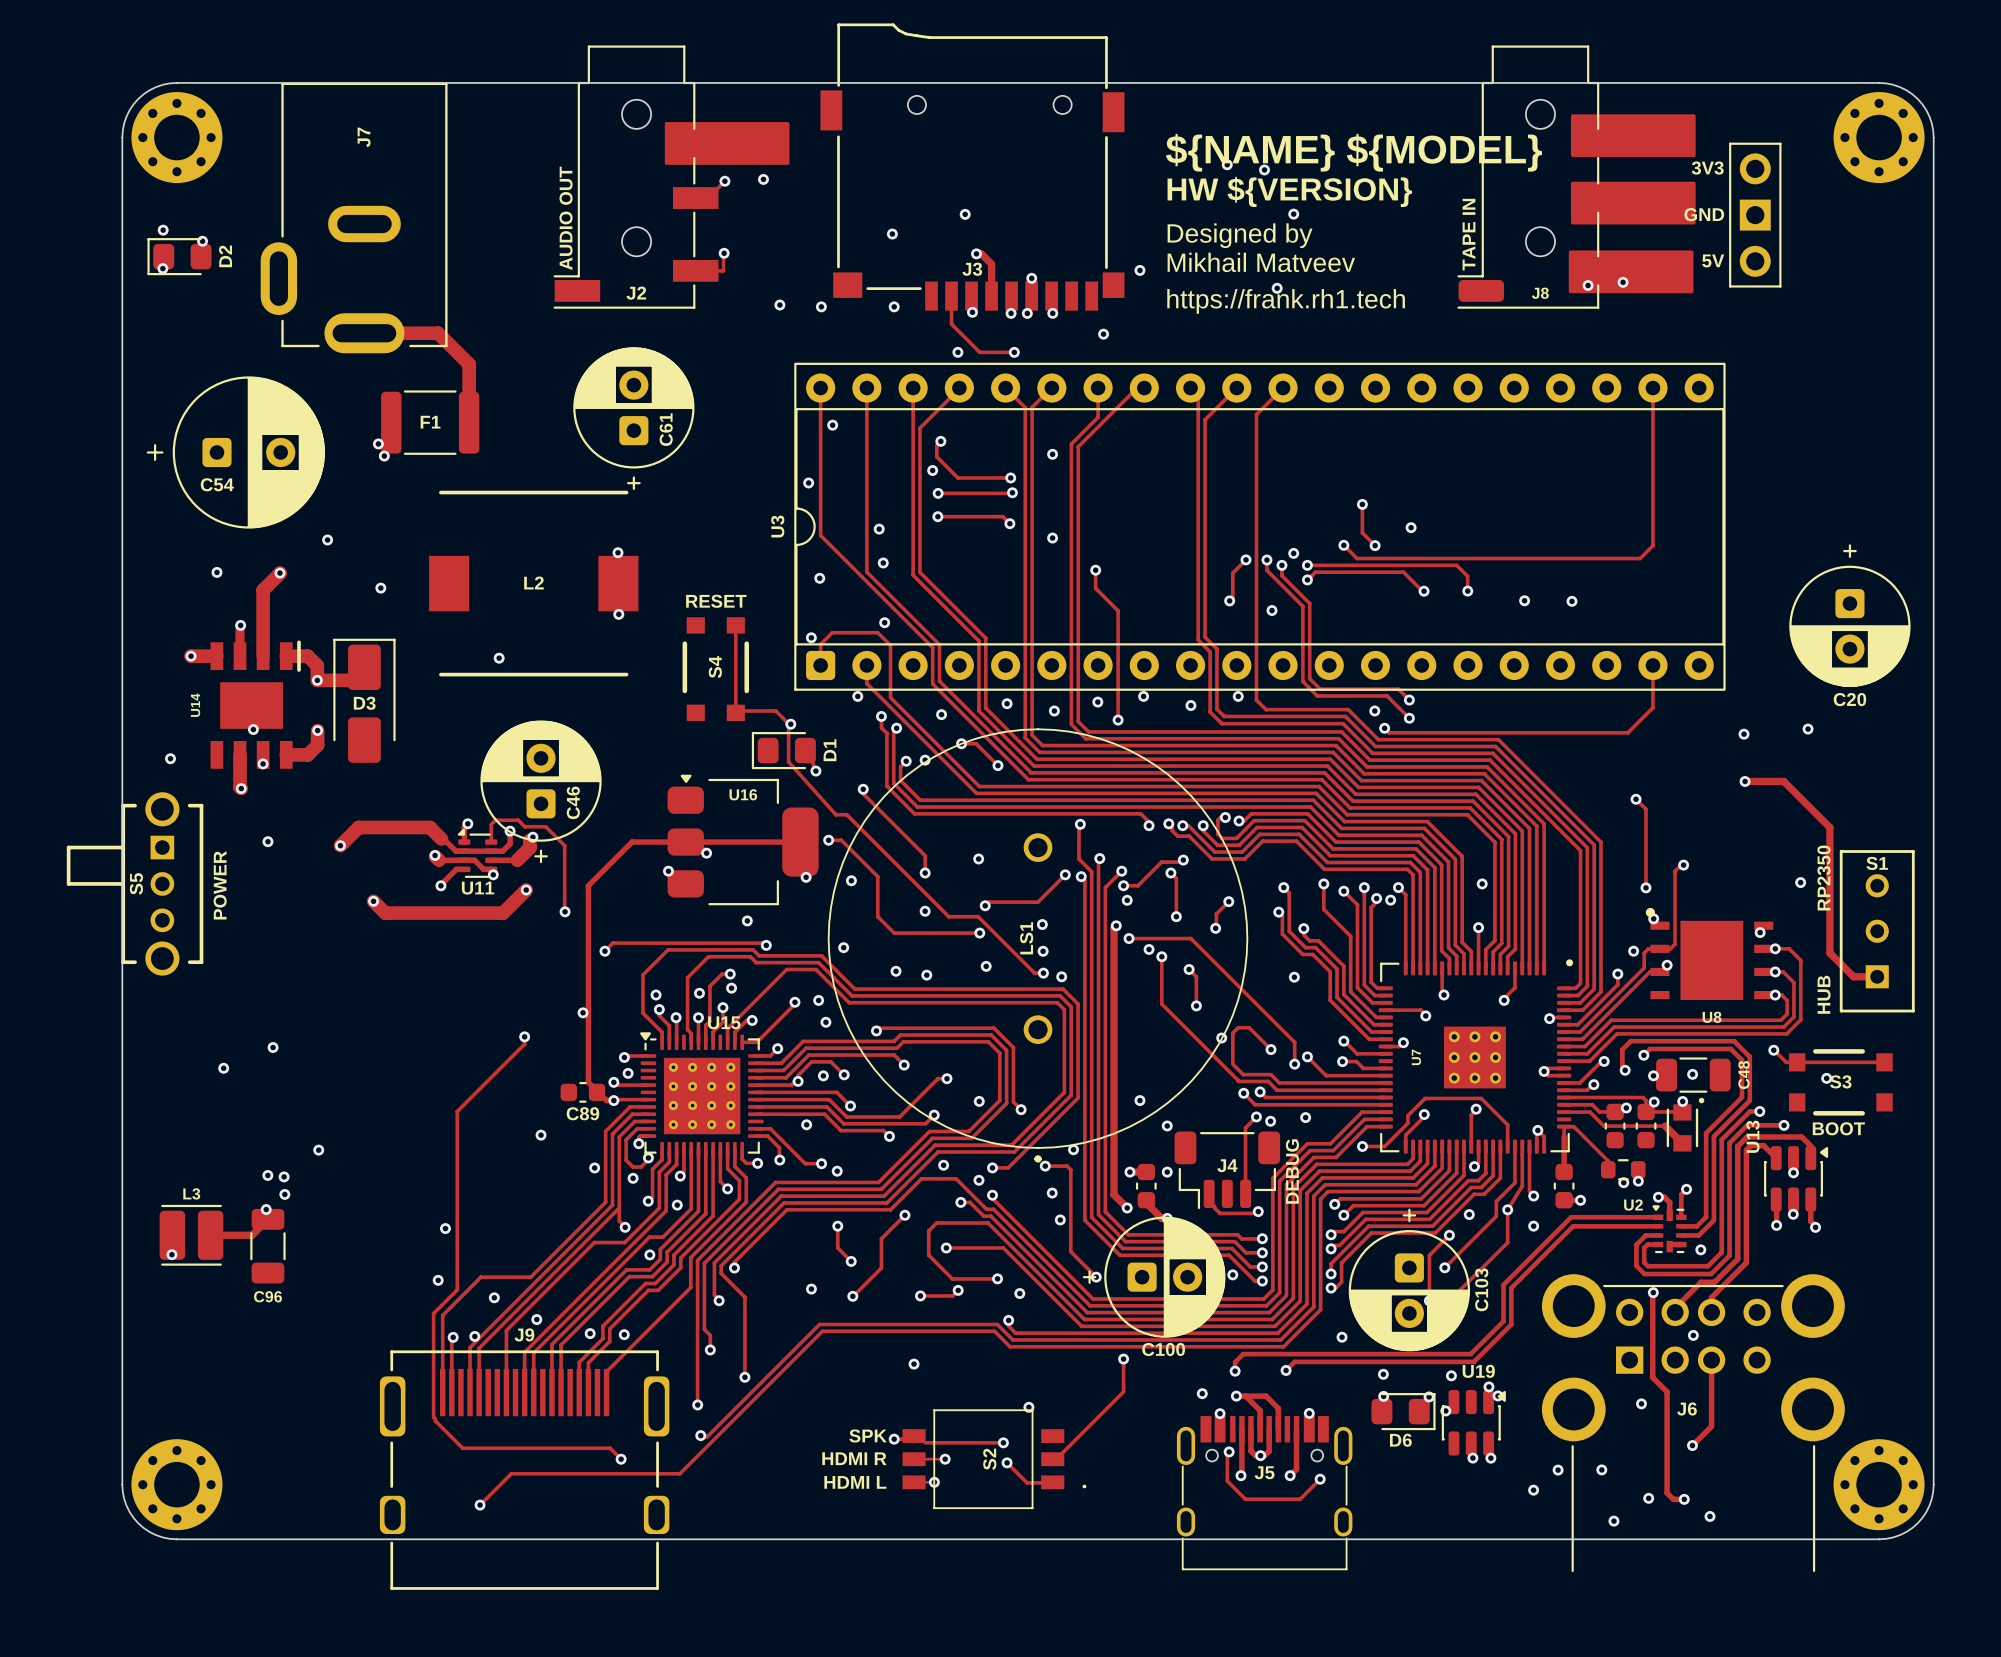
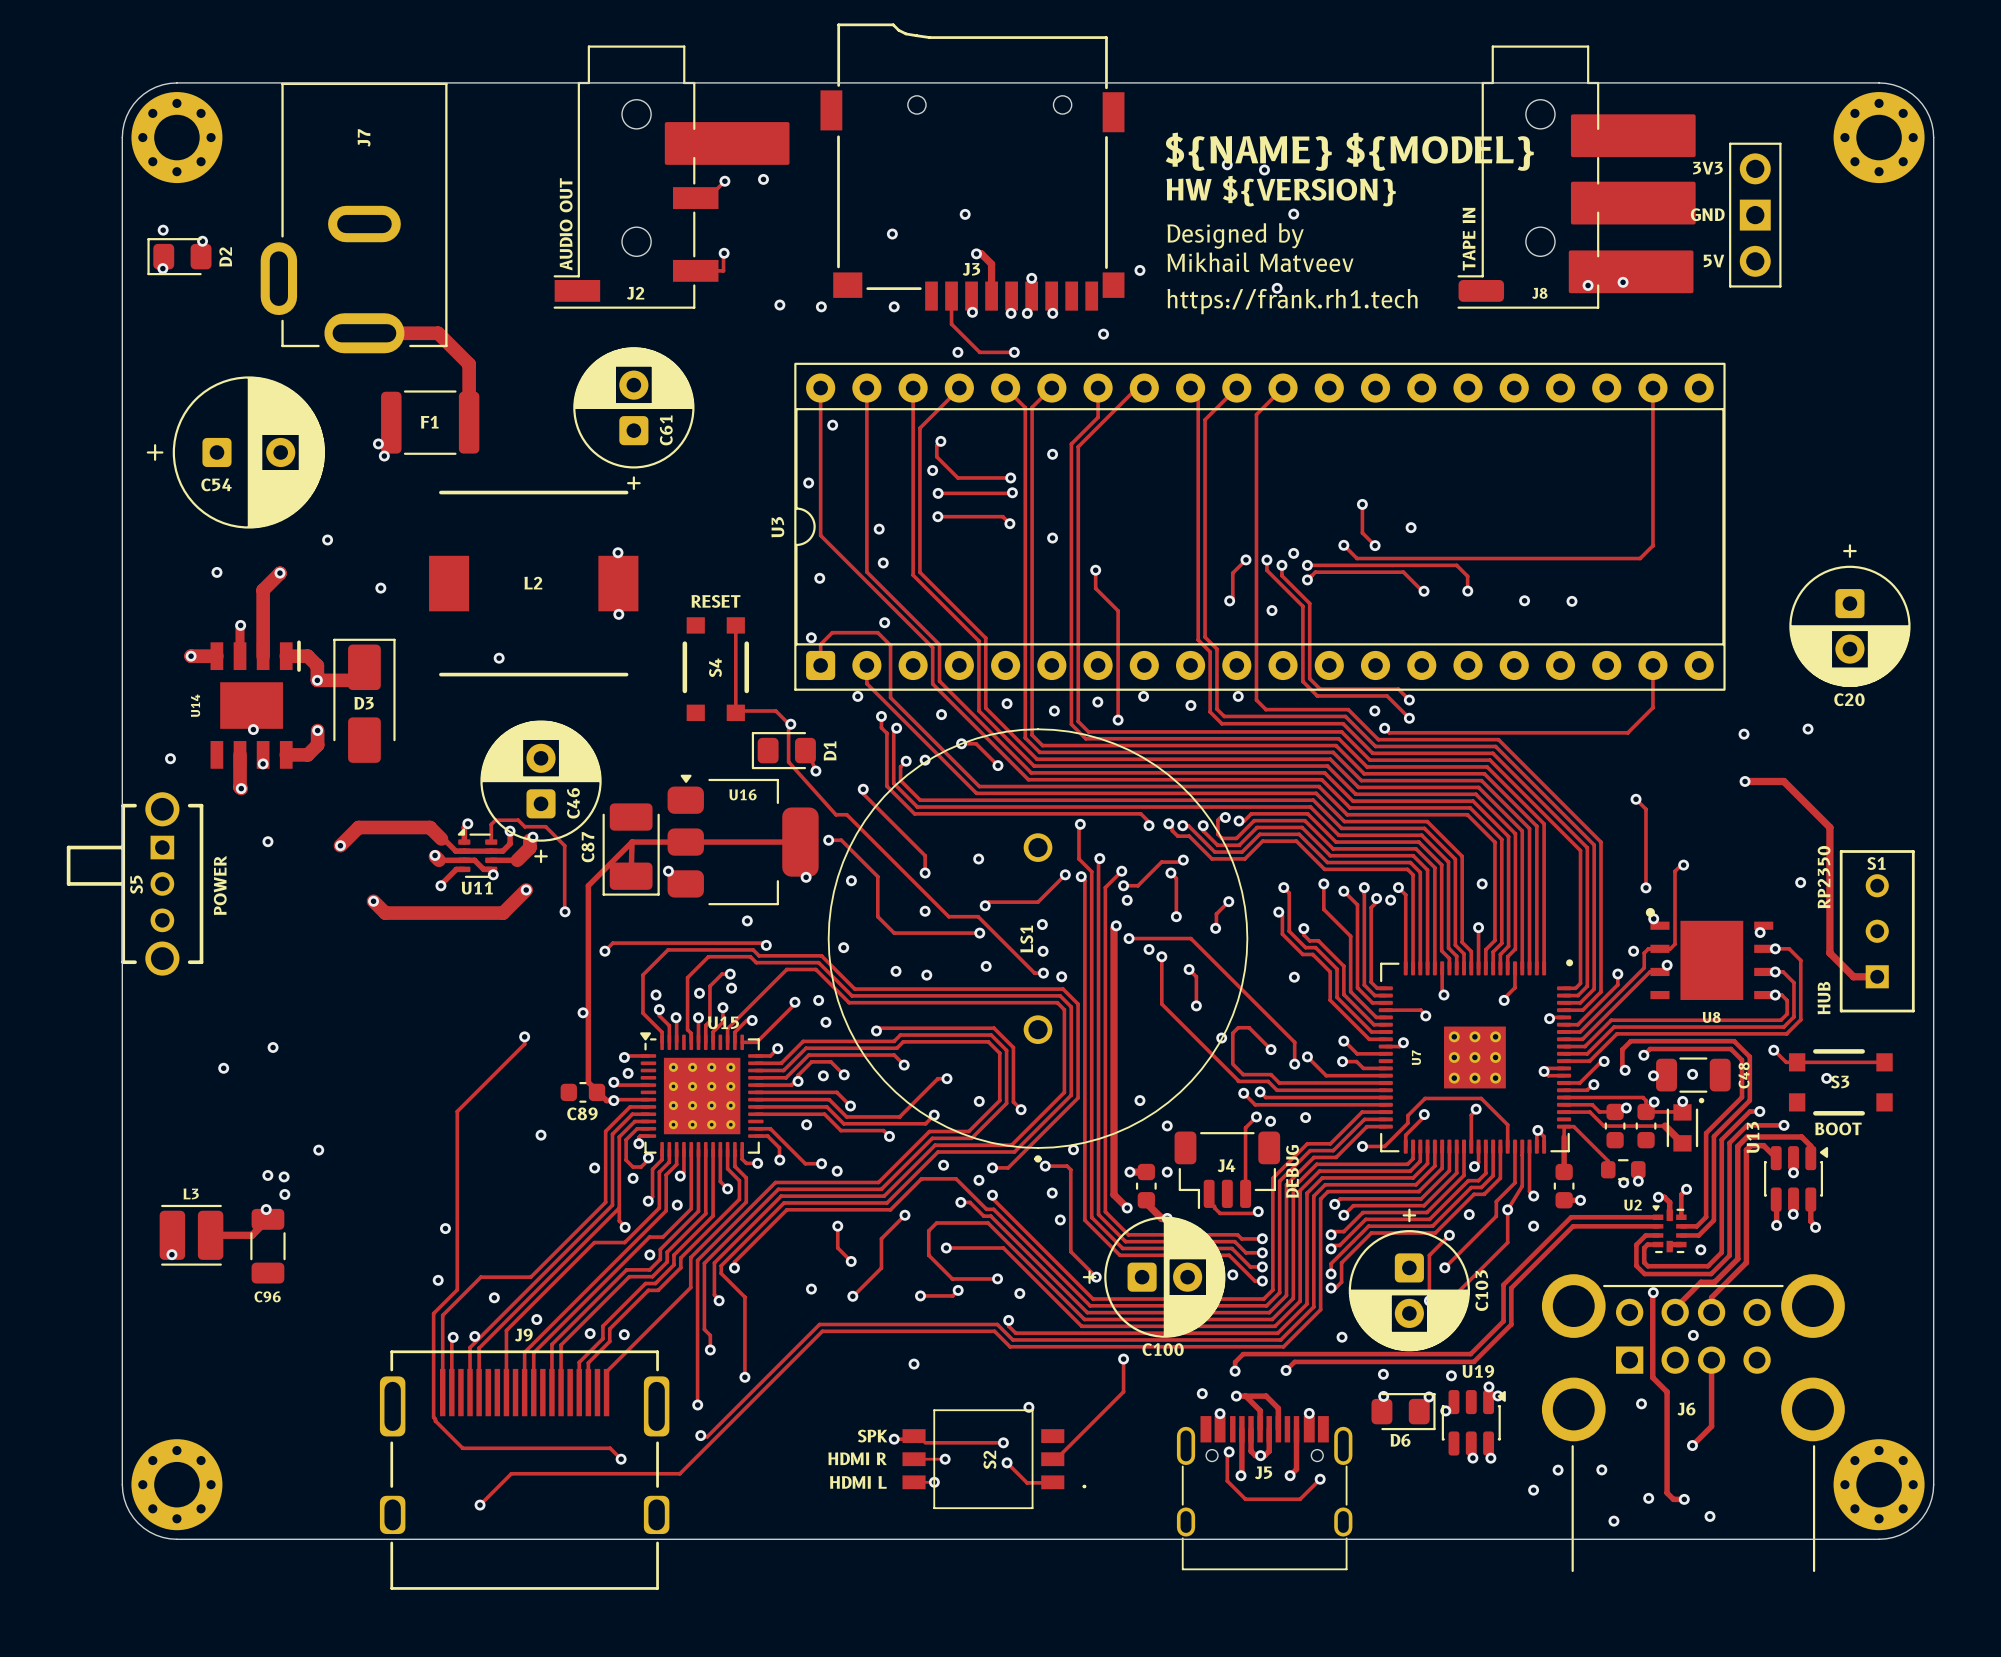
track: none -> (632, 842) (631, 876)
C87: none -> (631, 849)
via: (706, 853) -> none

